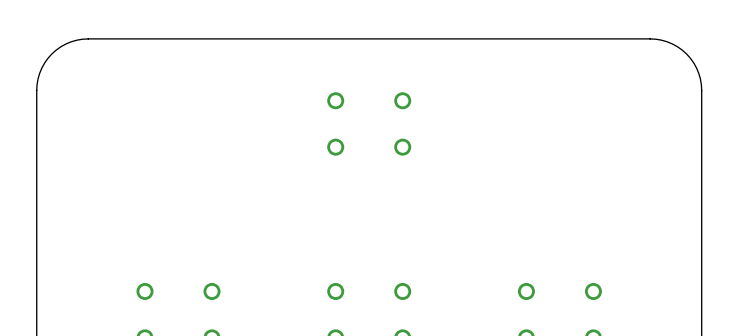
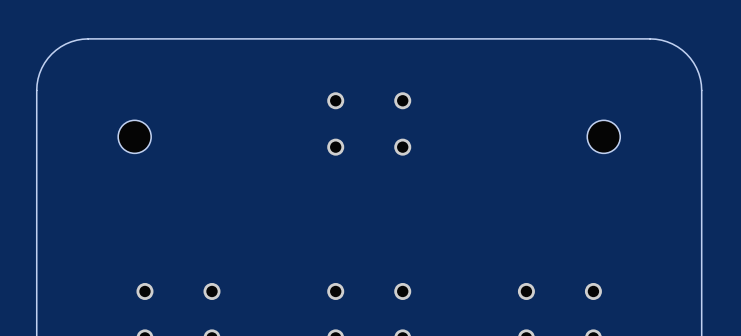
part: none -> (134, 136)
part: none -> (603, 136)

